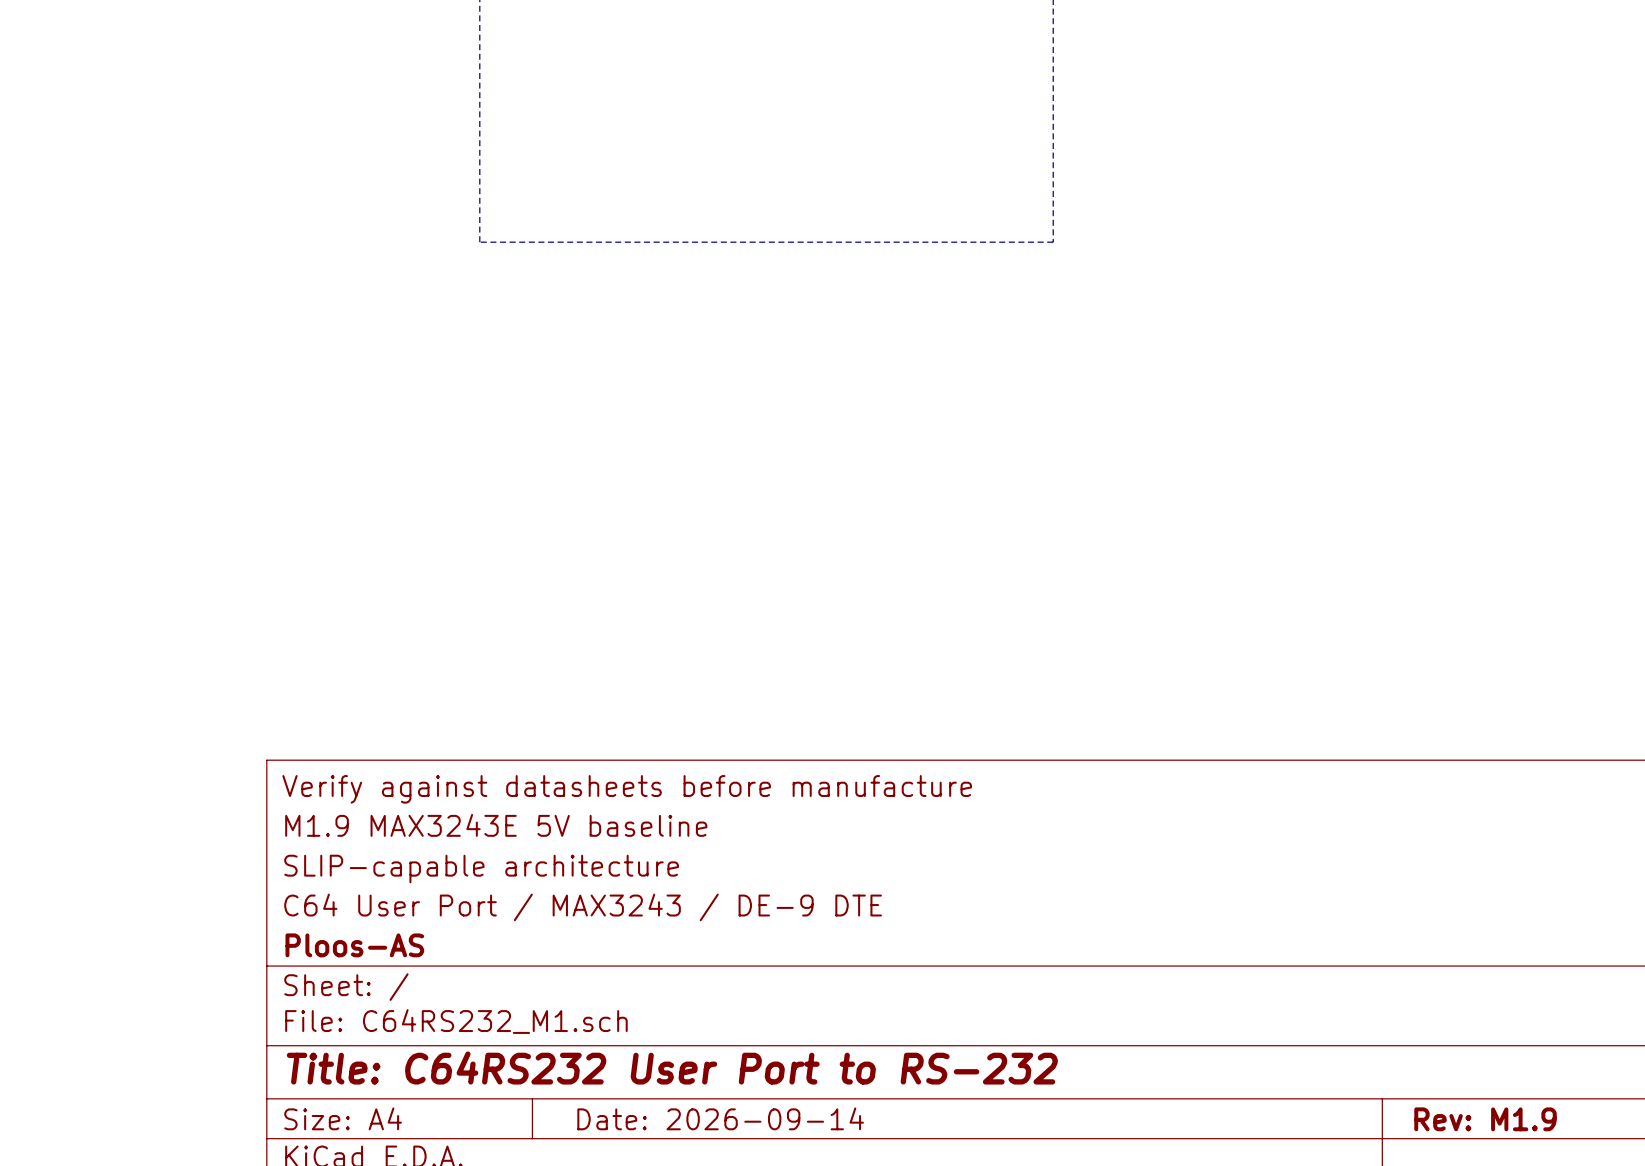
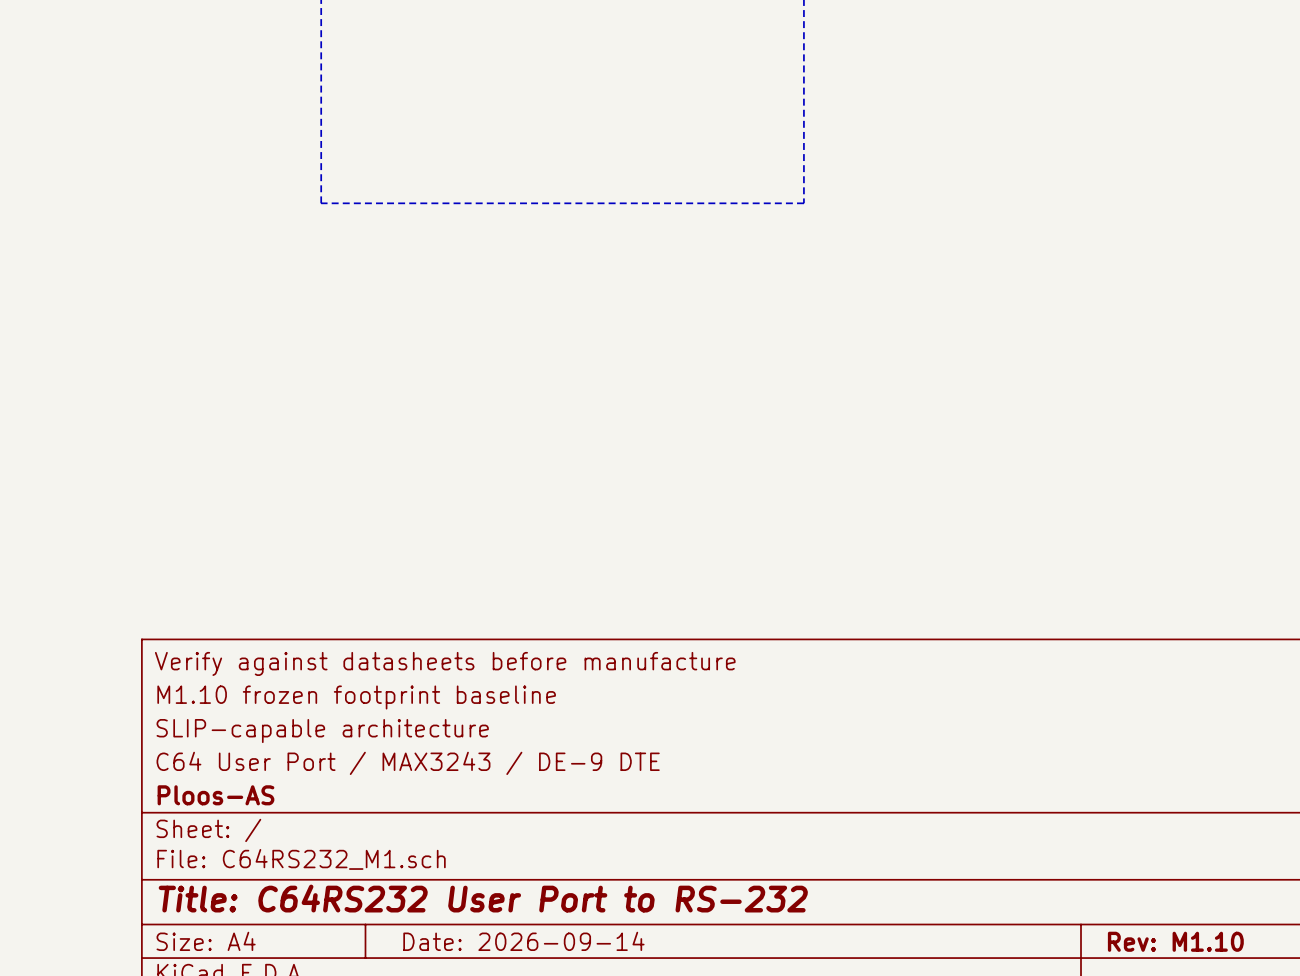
title block: M1.9 MAX3243E 5V baseline (496, 825) -> M1.10 frozen footprint baseline (356, 697)
title block: Rev: M1.9 (1485, 1119) -> Rev: M1.10 (1175, 941)

